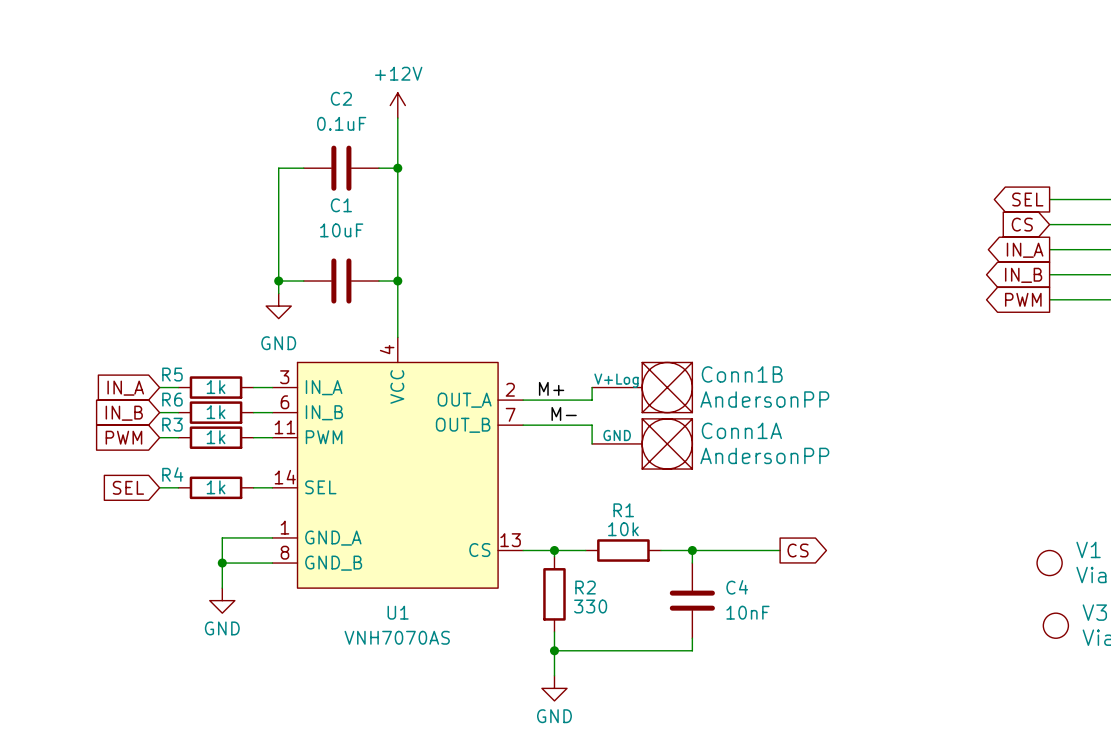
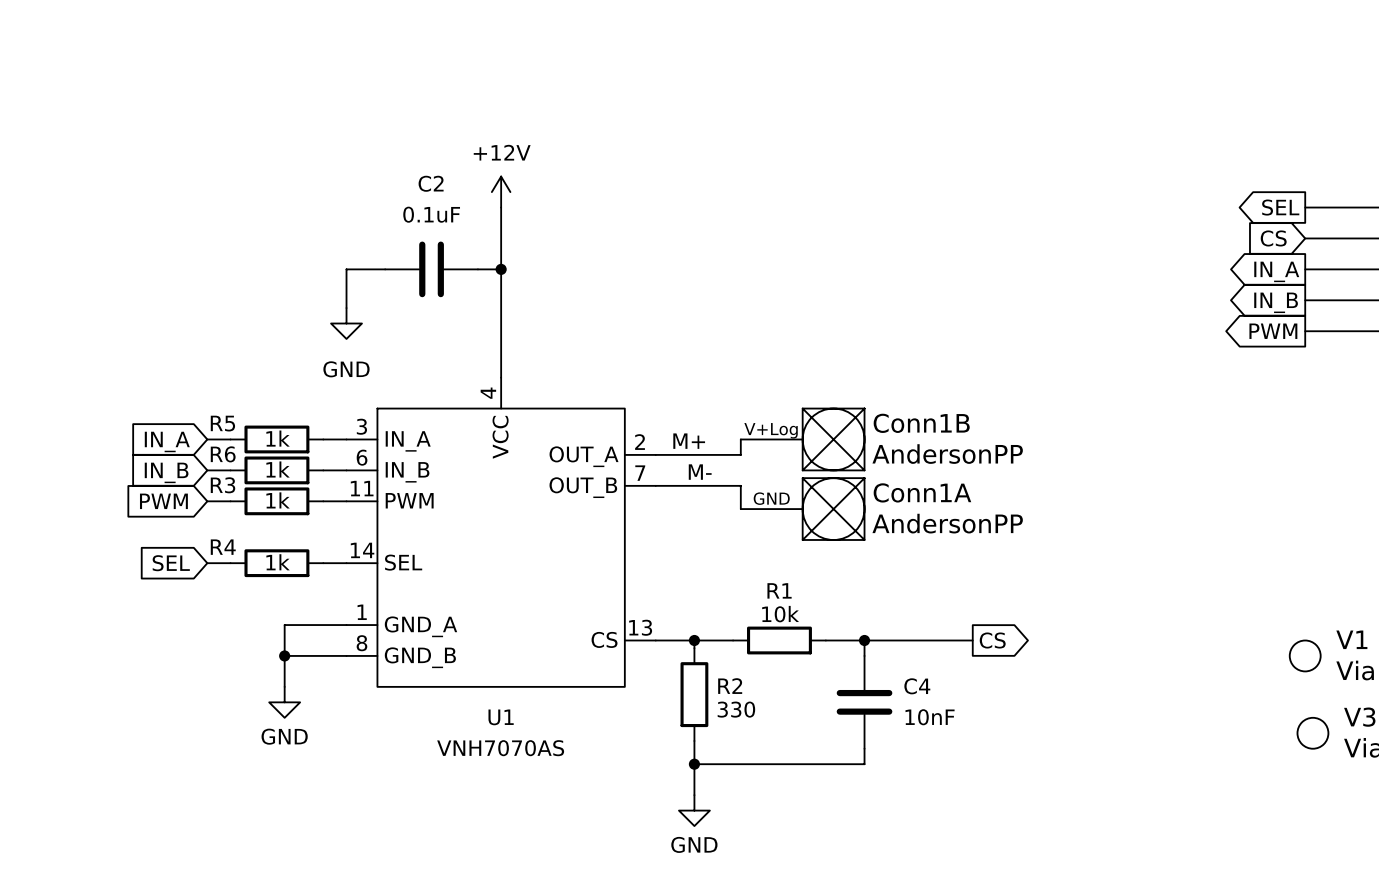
power symbol position: +12V (397, 105) -> +12V (501, 192)
wire: (397, 118) (397, 199) -> none
wire: (303, 168) (278, 168) (278, 293) -> none
C2 position: (341, 168) -> (431, 269)
wire: (378, 168) (397, 168) -> none
junction: (397, 168) -> none
wire: none -> (385, 269) (346, 269) (346, 308)
wire: (278, 281) (303, 281) -> none
junction: (278, 281) -> none
C1: 10uF (341, 281) -> none
wire: (378, 281) (397, 281) -> (477, 269) (501, 269)
junction position: (397, 281) -> (501, 269)
power symbol position: GND (278, 306) -> GND (346, 323)

